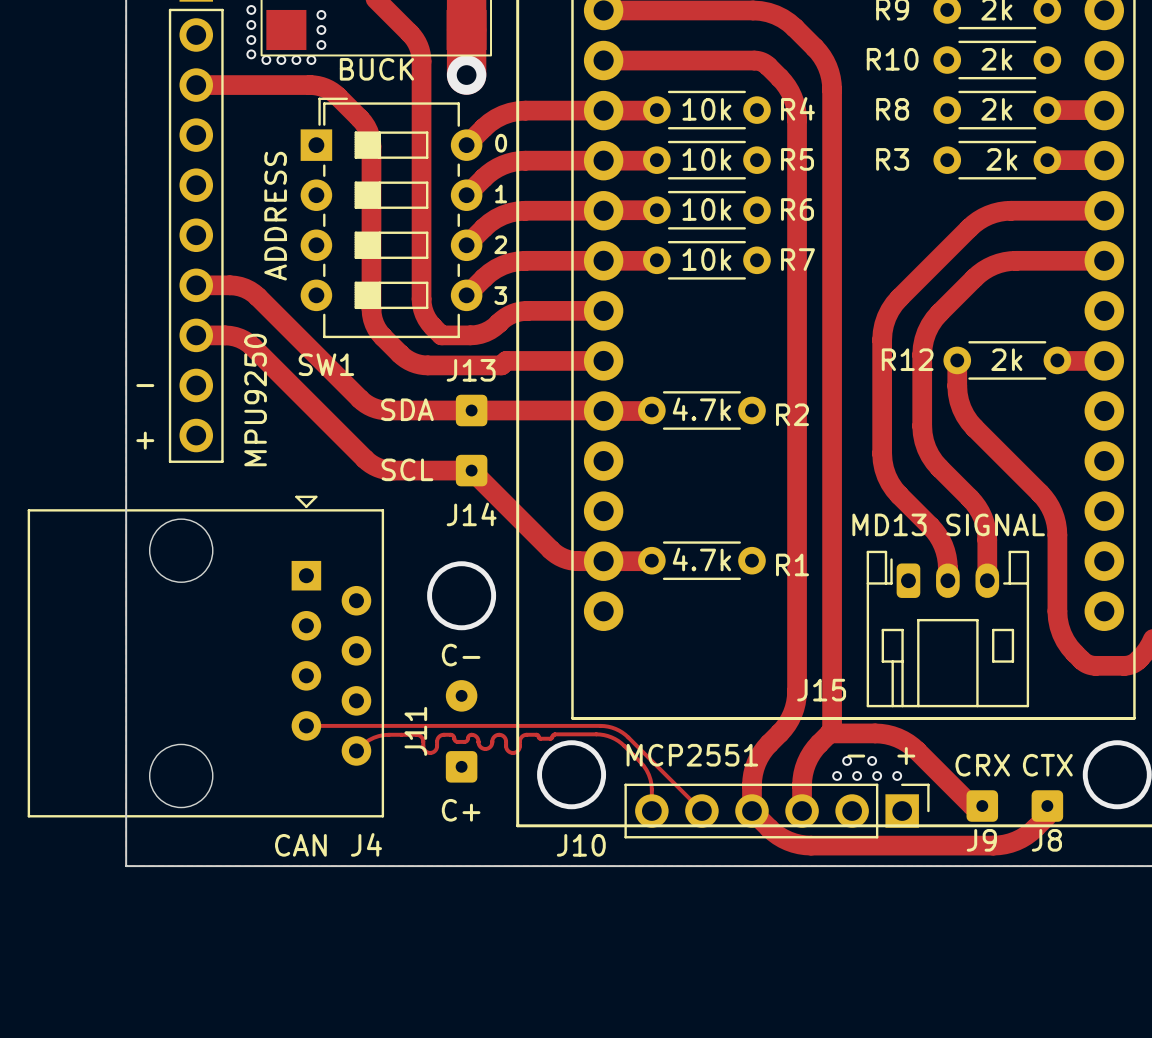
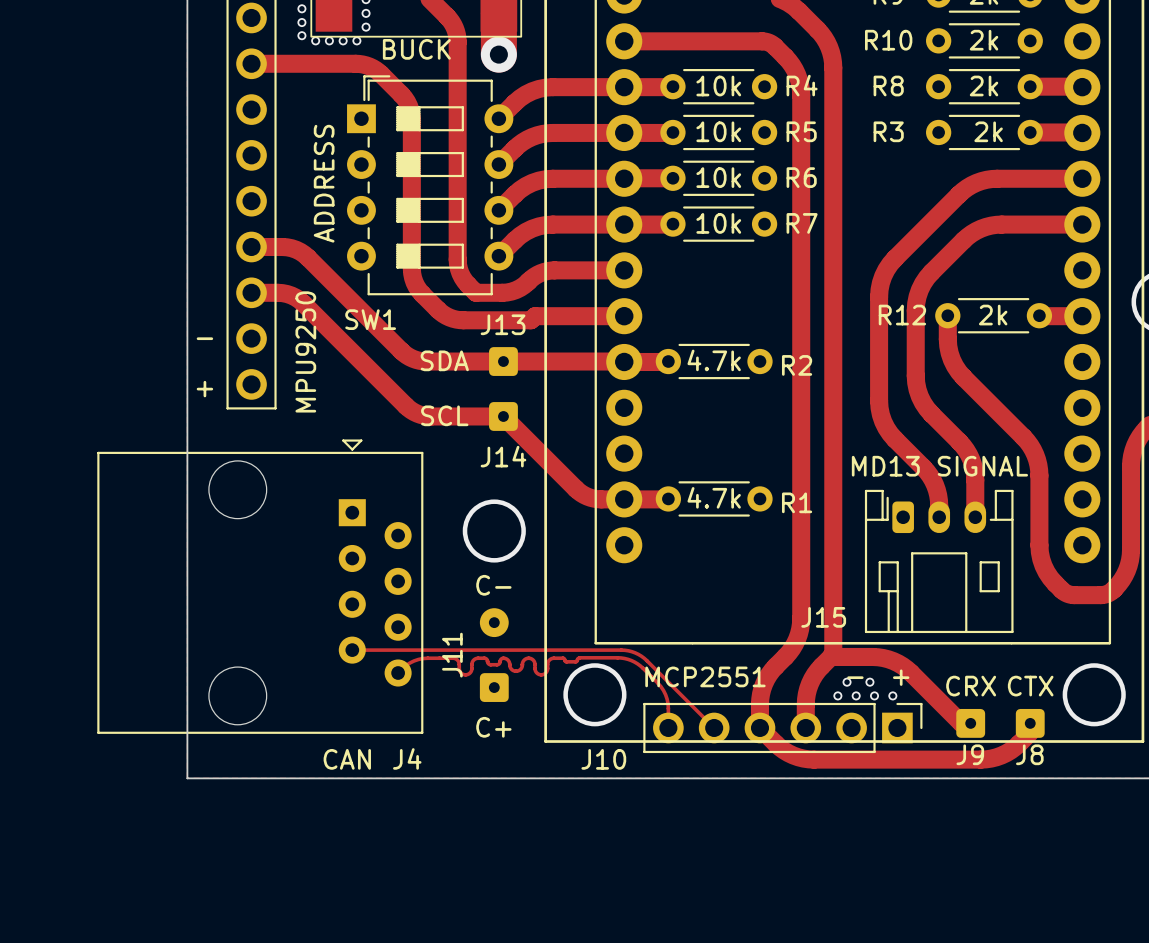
text: 0 (501, 143) -> none
text: 1 (501, 193) -> none
text: 2 (500, 244) -> none
text: 3 (500, 295) -> none

